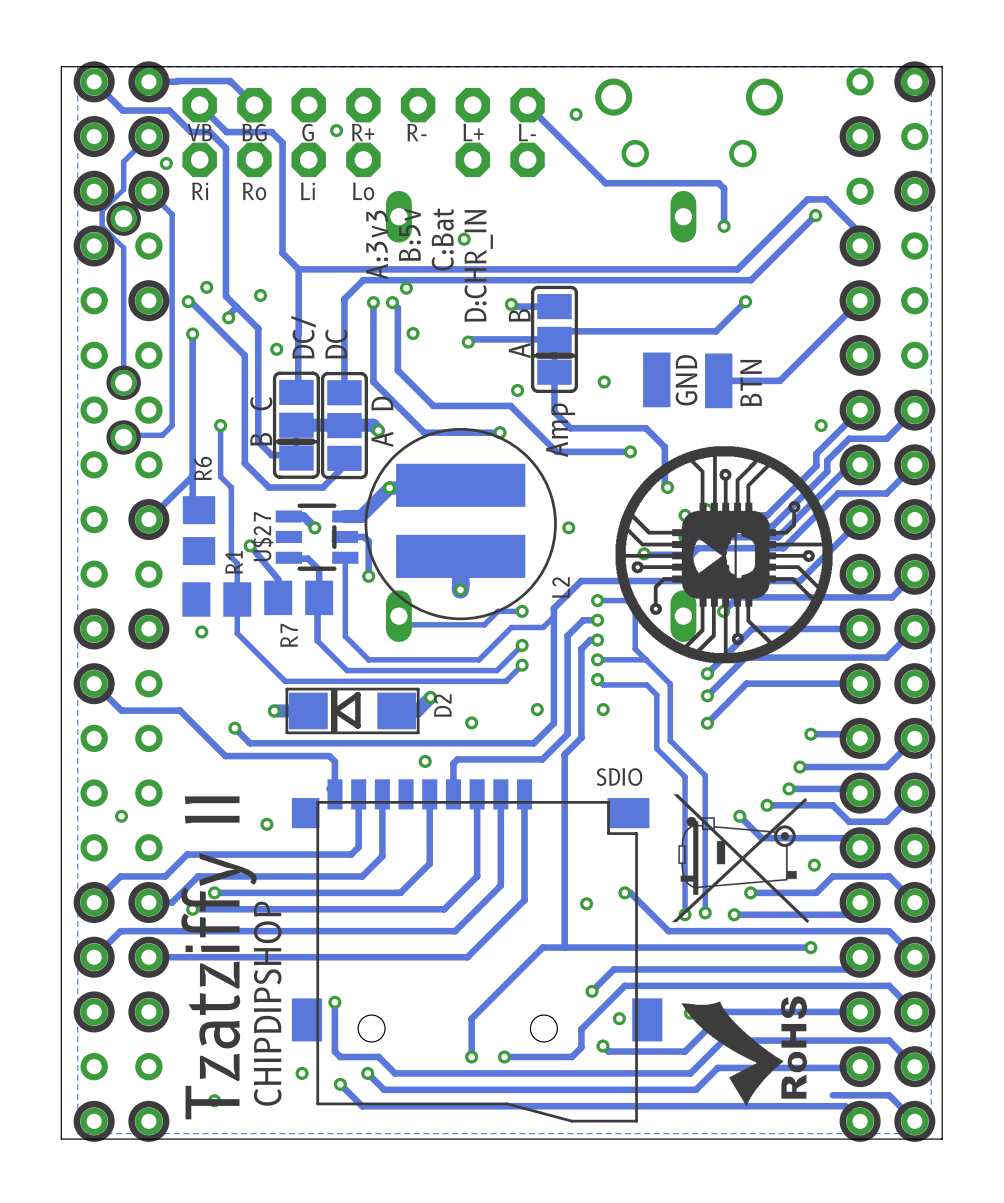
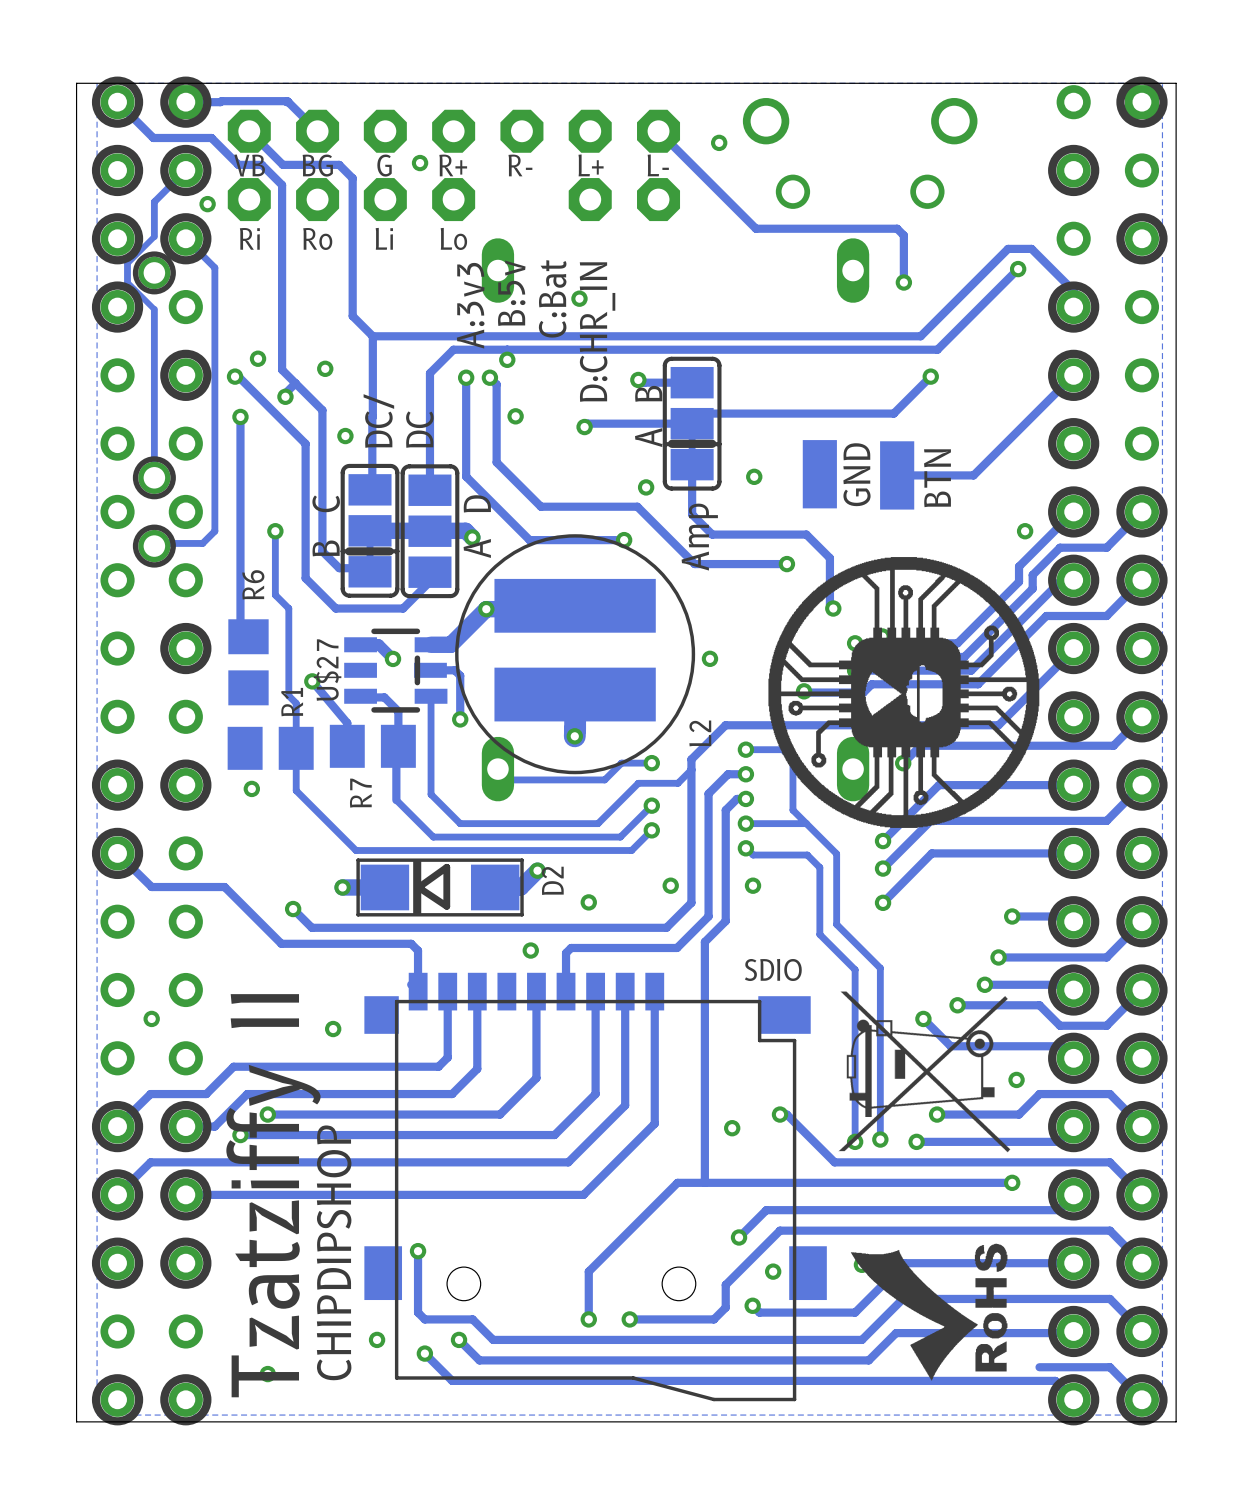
track: (192, 476) (148, 519) -> none

